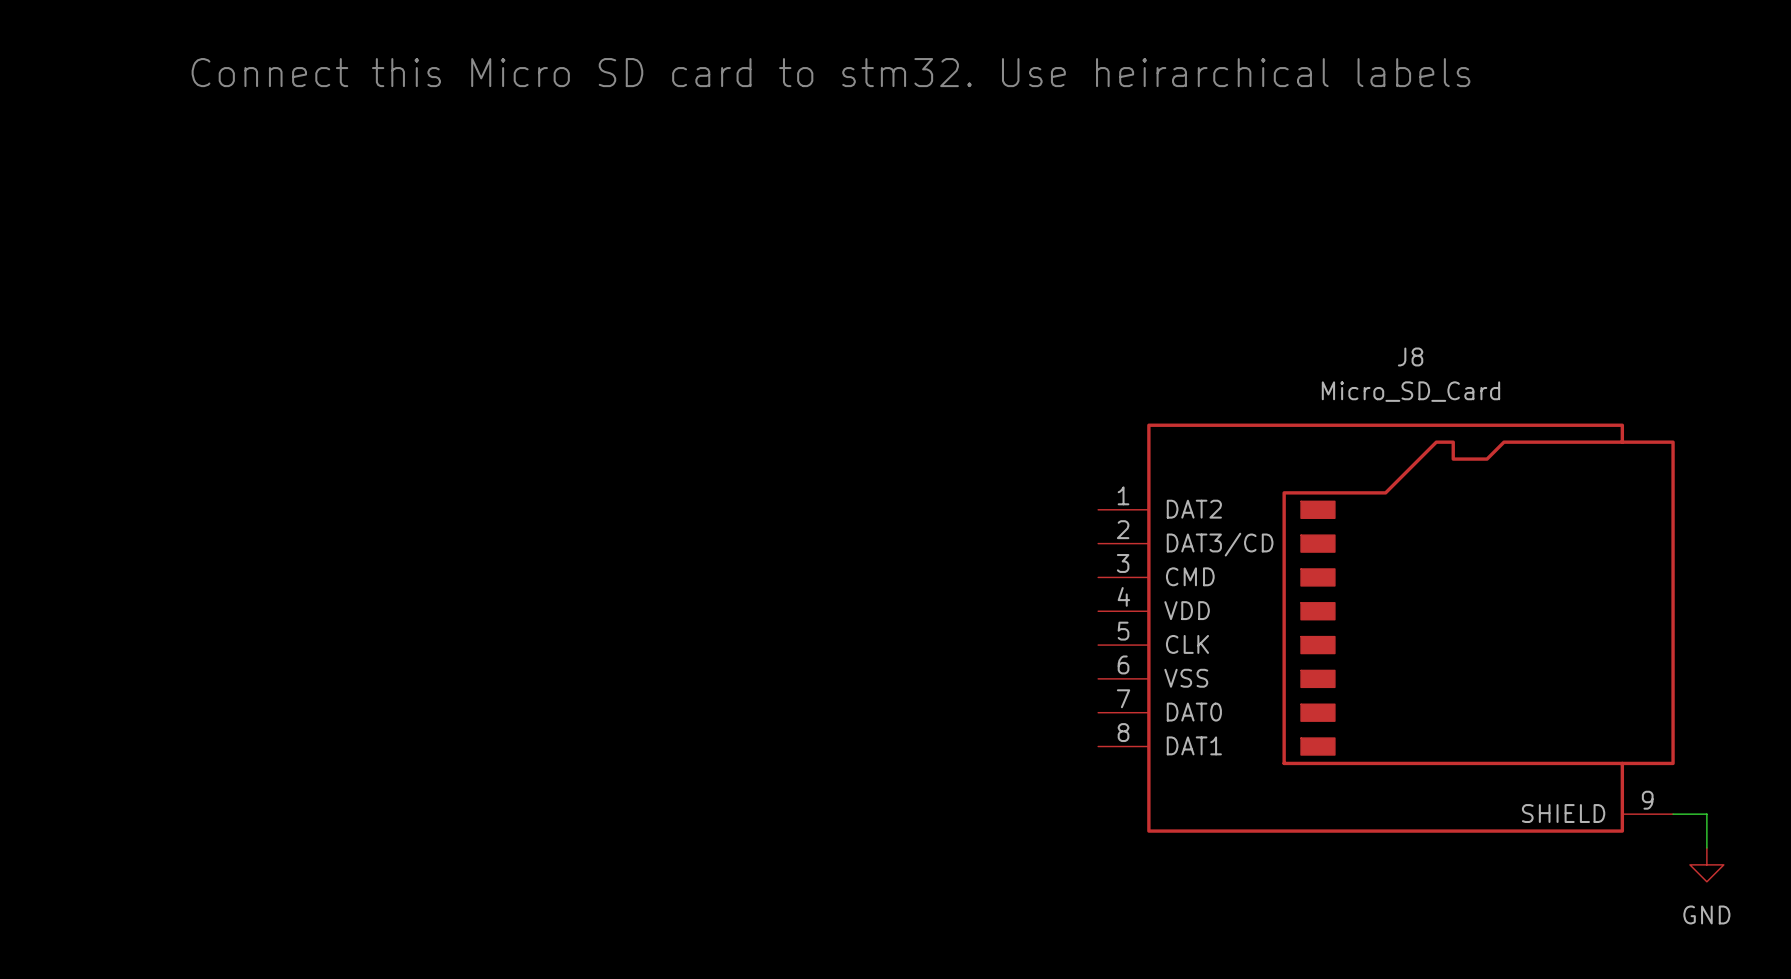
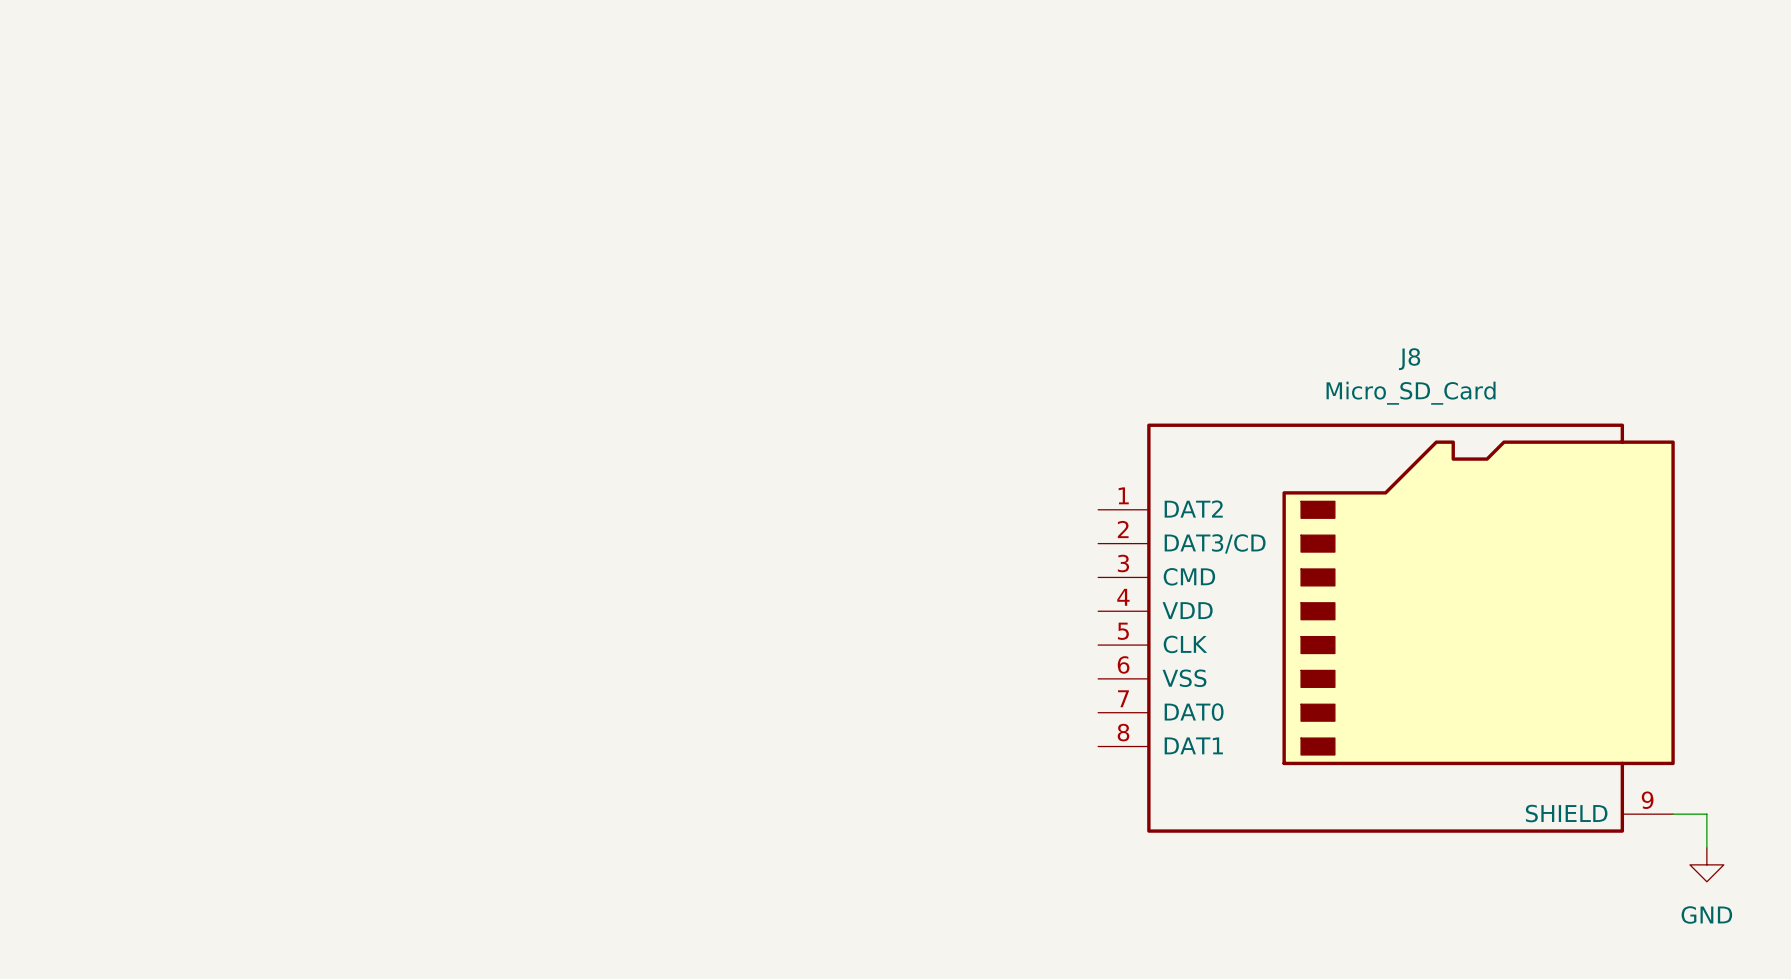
text: Connect this Micro SD card to stm32. Use heirarchical labels (830, 72) -> none

